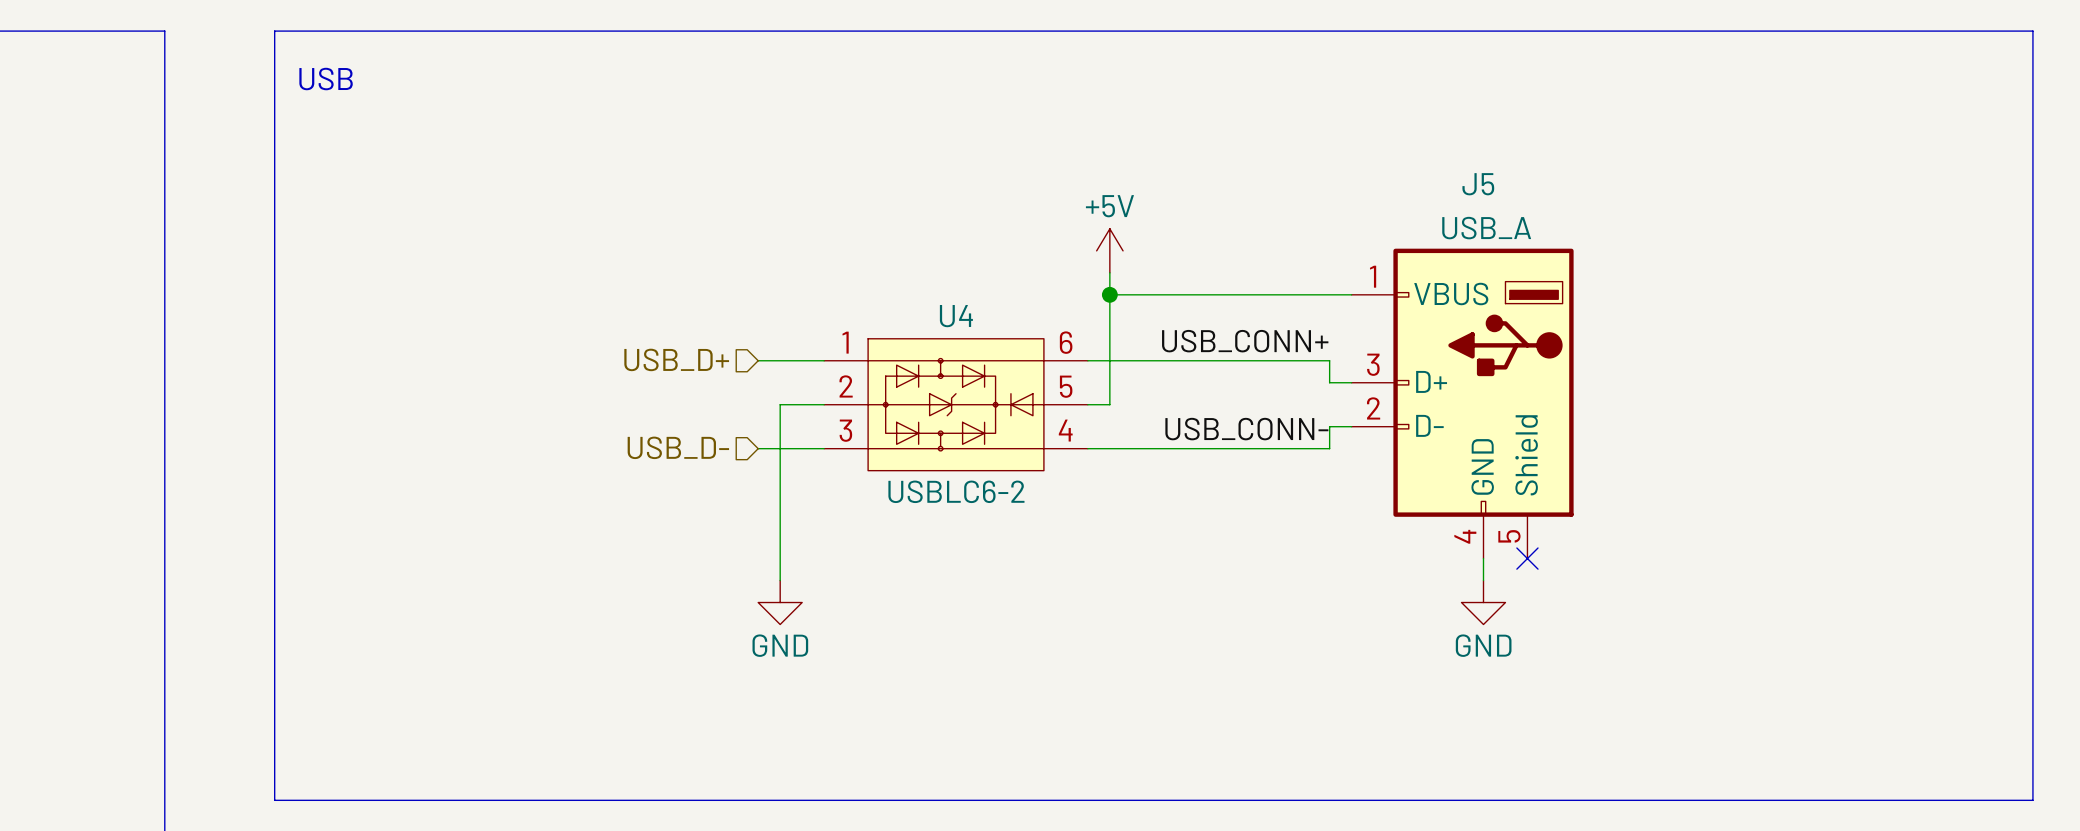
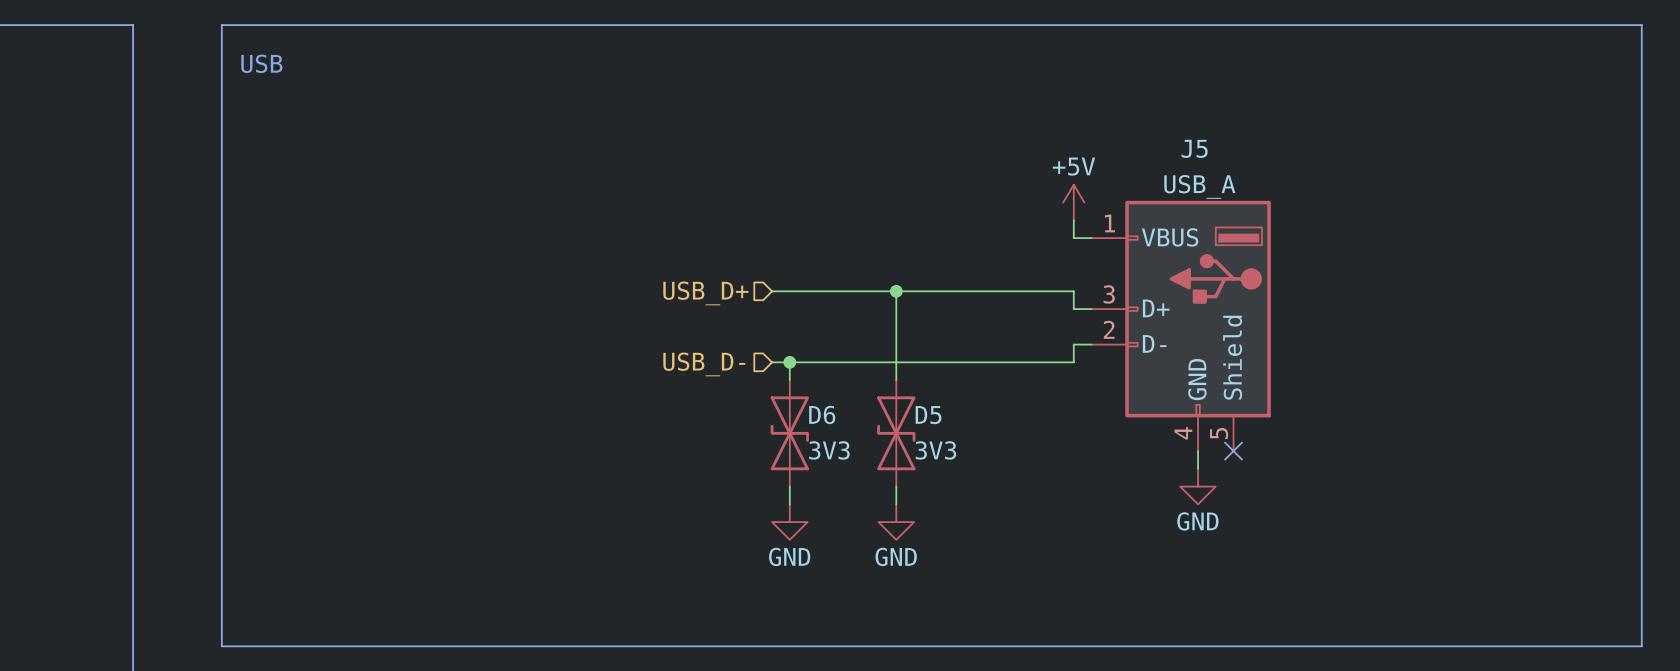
power symbol position: +5V (1109, 250) -> +5V (1073, 202)
wire: (1109, 272) (1109, 360) -> none
wire: (1109, 294) (1329, 294) -> (1073, 220) (1073, 238)
junction position: (1109, 294) -> (896, 291)
label: USB_CONN+ (1245, 341) -> none
hierarchical label position: USB_D+ (676, 359) -> USB_D+ (705, 293)
wire: (758, 360) (824, 360) -> none
wire: (824, 404) (780, 404) (780, 580) -> none
U4: USBLC6-2 (956, 404) -> none
wire: (1087, 404) (1109, 404) -> (896, 380) (896, 326)
label: USB_CONN- (1246, 429) -> none
hierarchical label position: USB_D- (678, 447) -> USB_D- (704, 364)
wire: (758, 448) (824, 448) -> none
junction: none -> (789, 362)
D6: none -> 3V3 (789, 433)
D5: none -> 3V3 (896, 433)
power symbol: GND (780, 602) -> none
wire: none -> (789, 486) (789, 504)
wire: none -> (896, 486) (896, 504)
power symbol: none -> GND (789, 522)
power symbol: none -> GND (896, 522)

